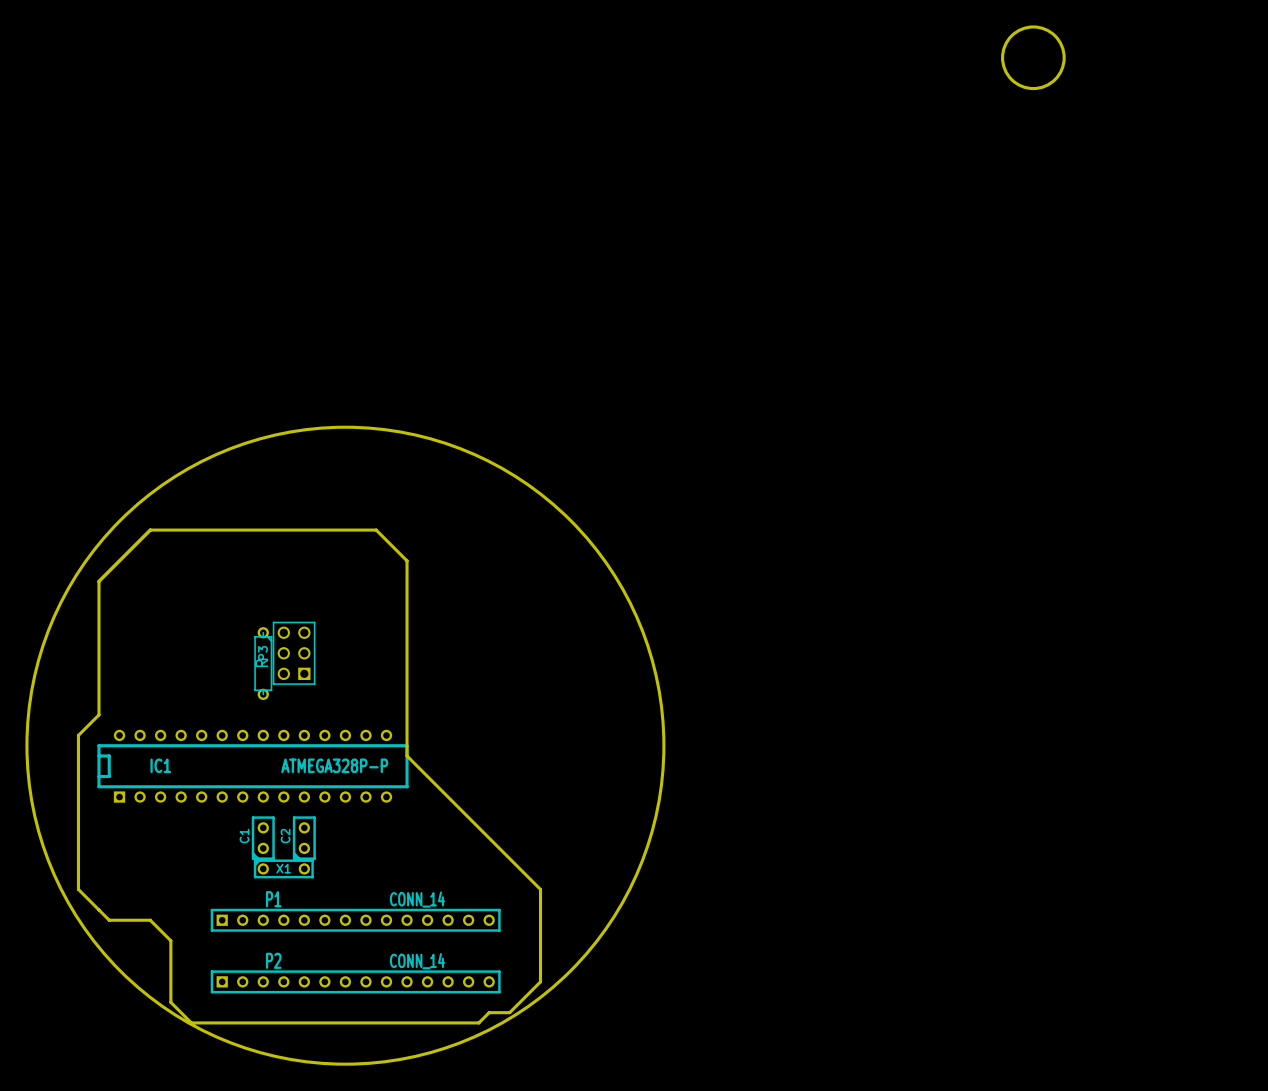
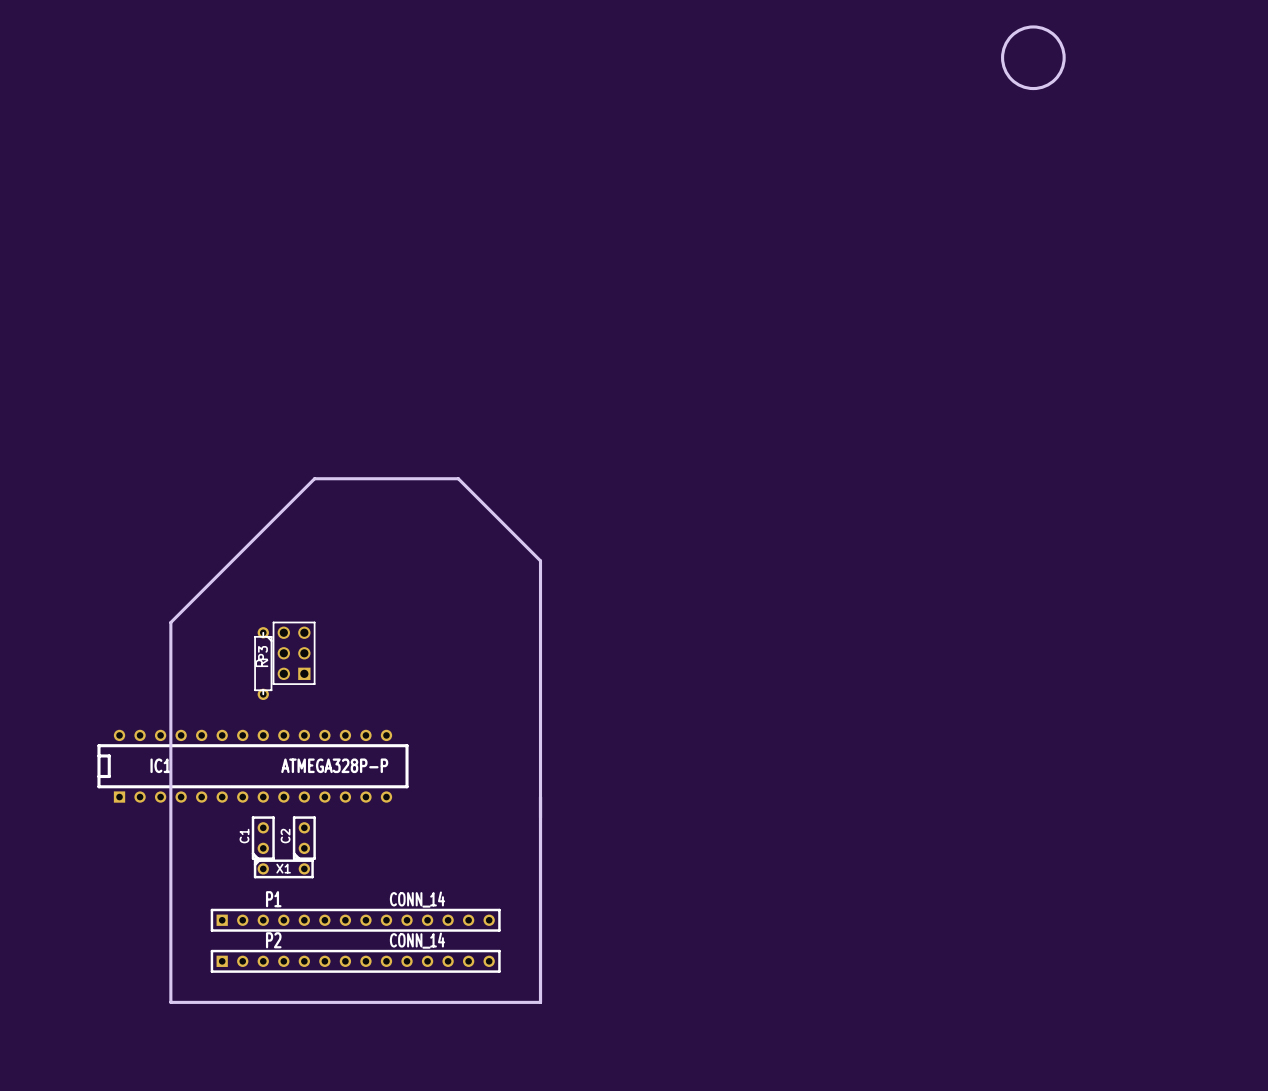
round board edge: [25, 425, 666, 1066] -> none
board edge: (540, 889) (407, 755) (407, 560) (376, 530) (150, 530) (98, 581) (98, 714) (78, 735) (78, 889) (109, 920) (150, 920) (170, 940) -> (540, 889) (540, 560) (458, 478) (314, 478) (170, 622) (170, 940)
P2 position: (355, 981) -> (355, 961)
board edge: (540, 981) (509, 1012) (489, 1012) (478, 1022) (191, 1022) (170, 1002) -> (540, 981) (540, 1002) (170, 1002)

